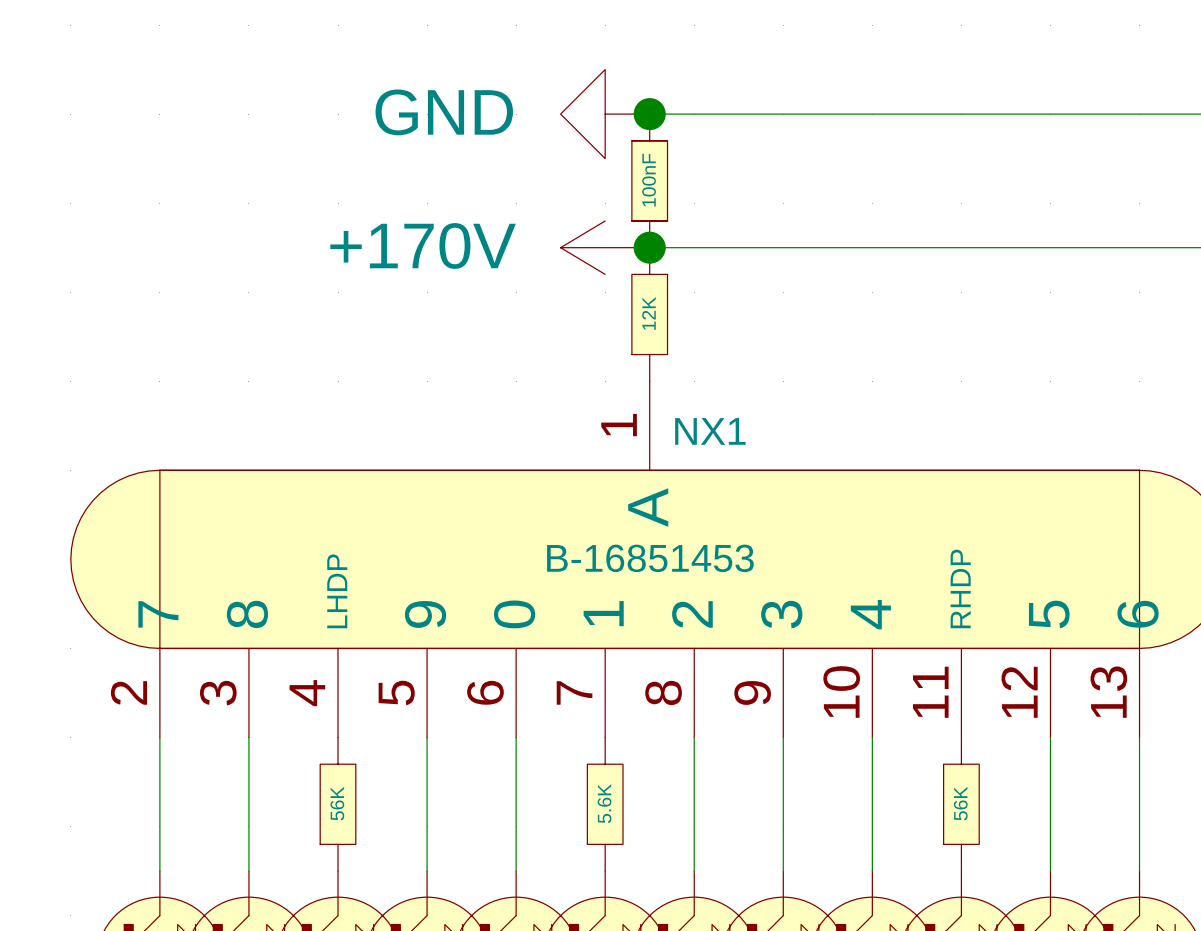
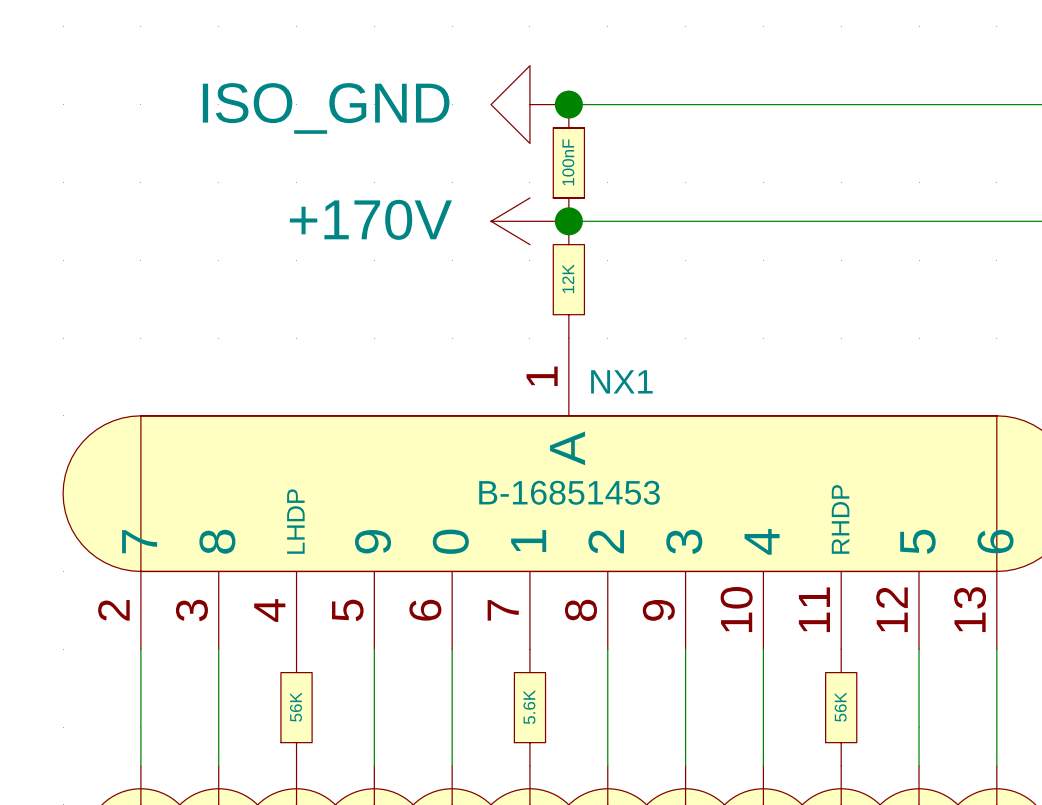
power symbol: GND (605, 114) -> ISO_GND (529, 104)

